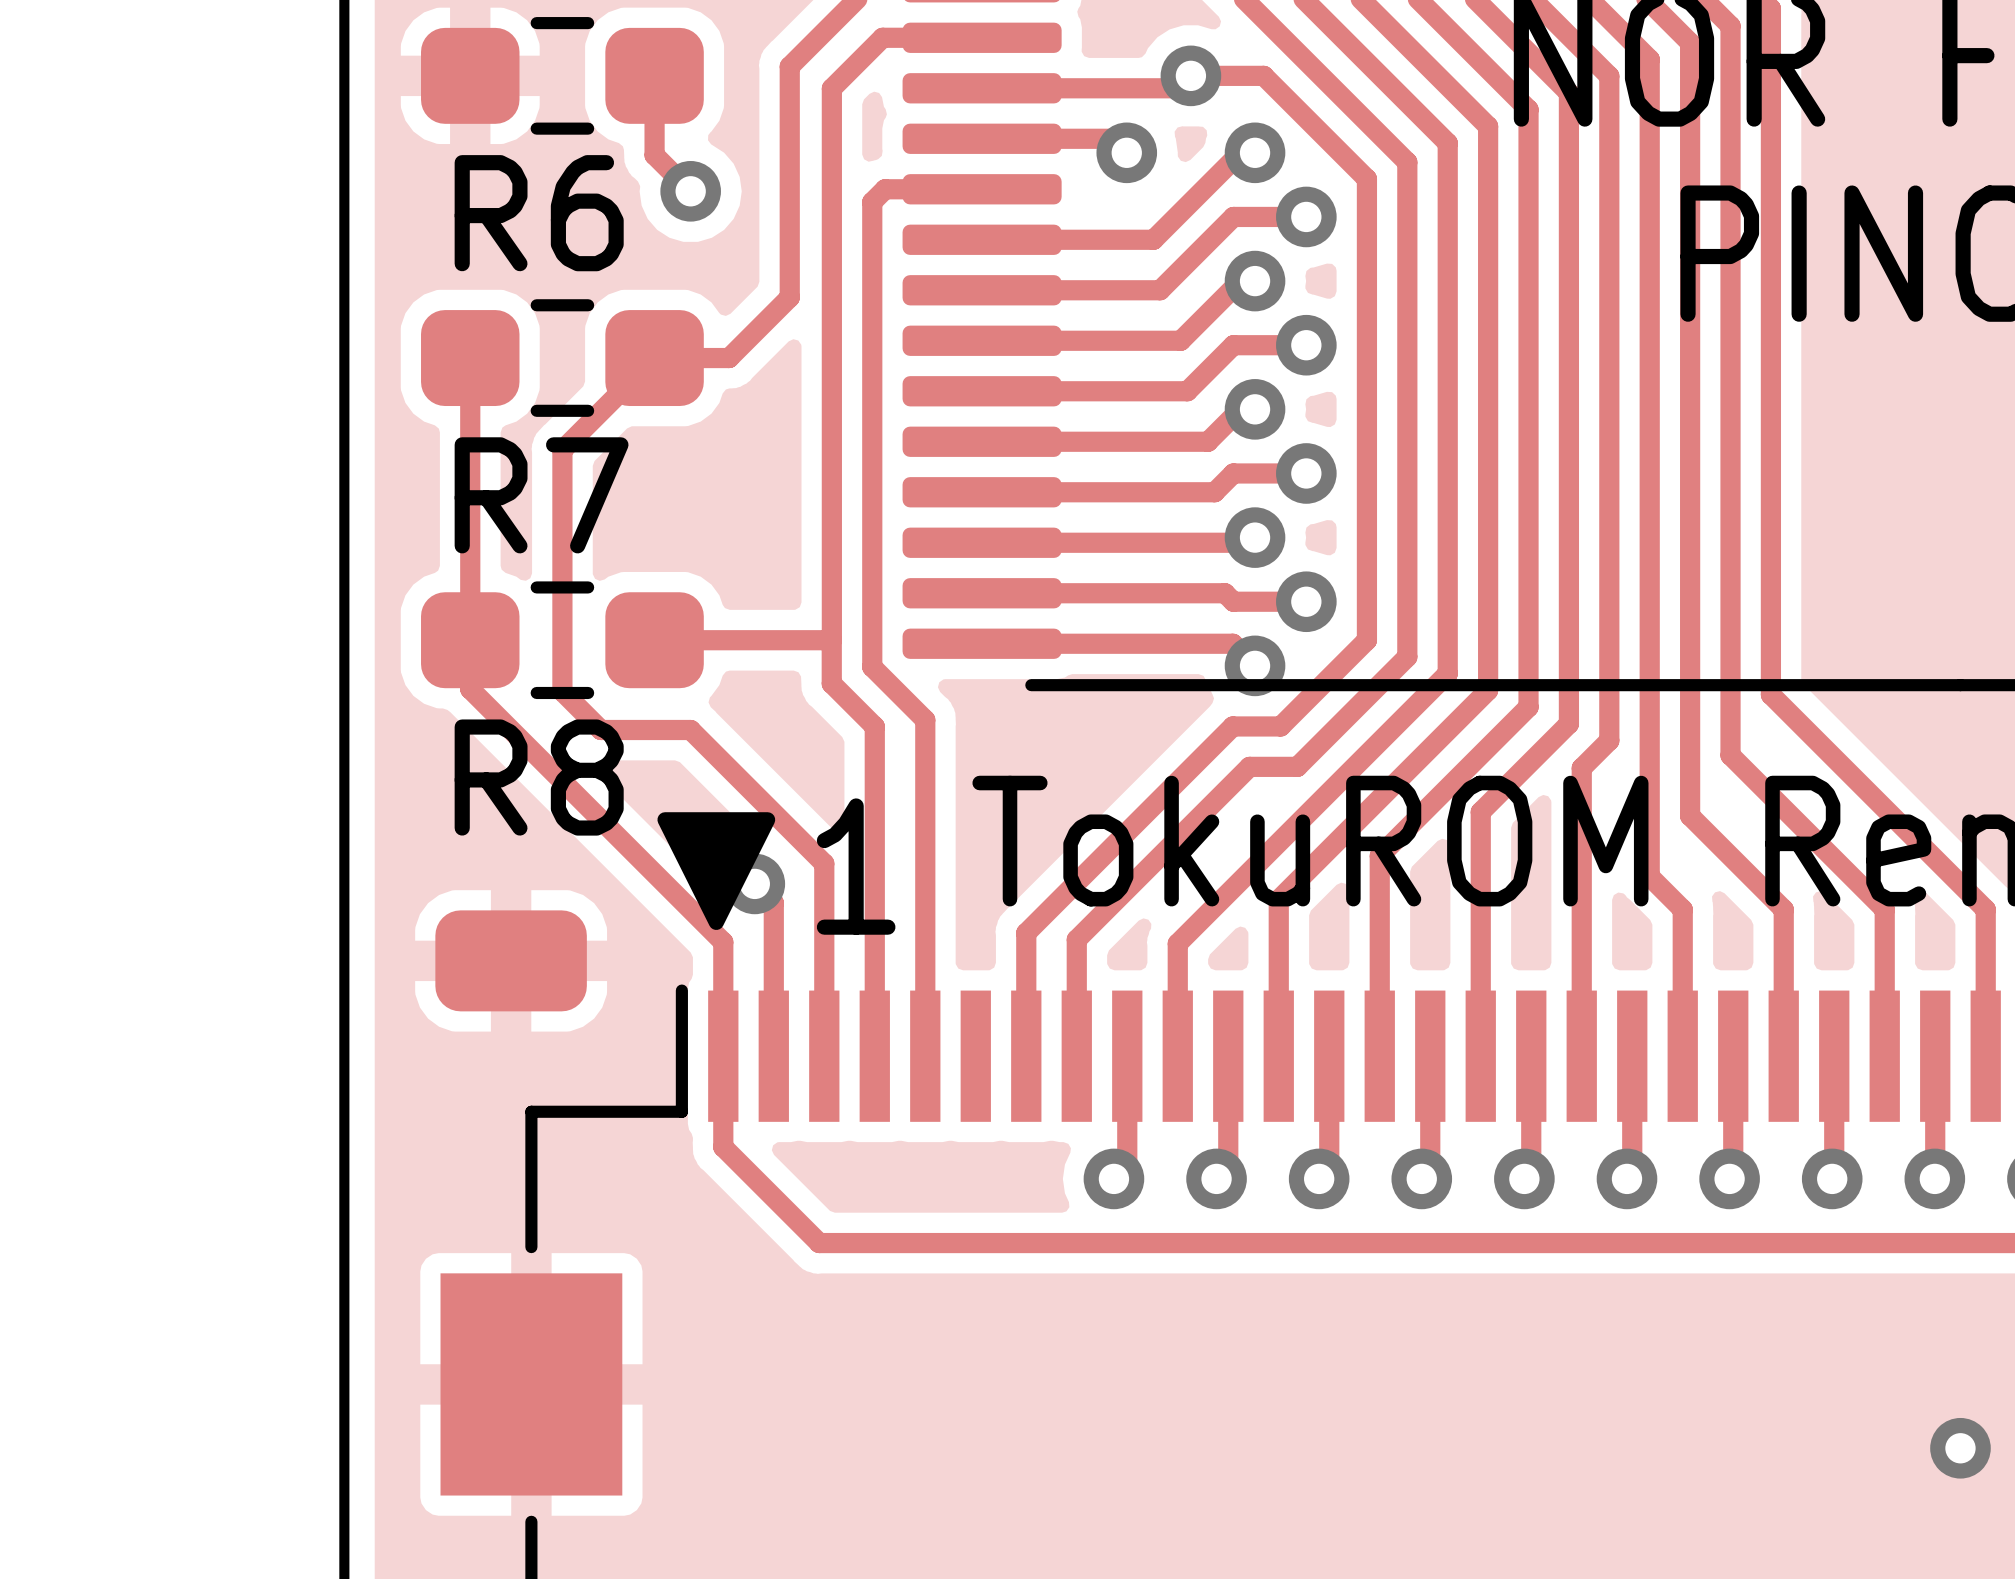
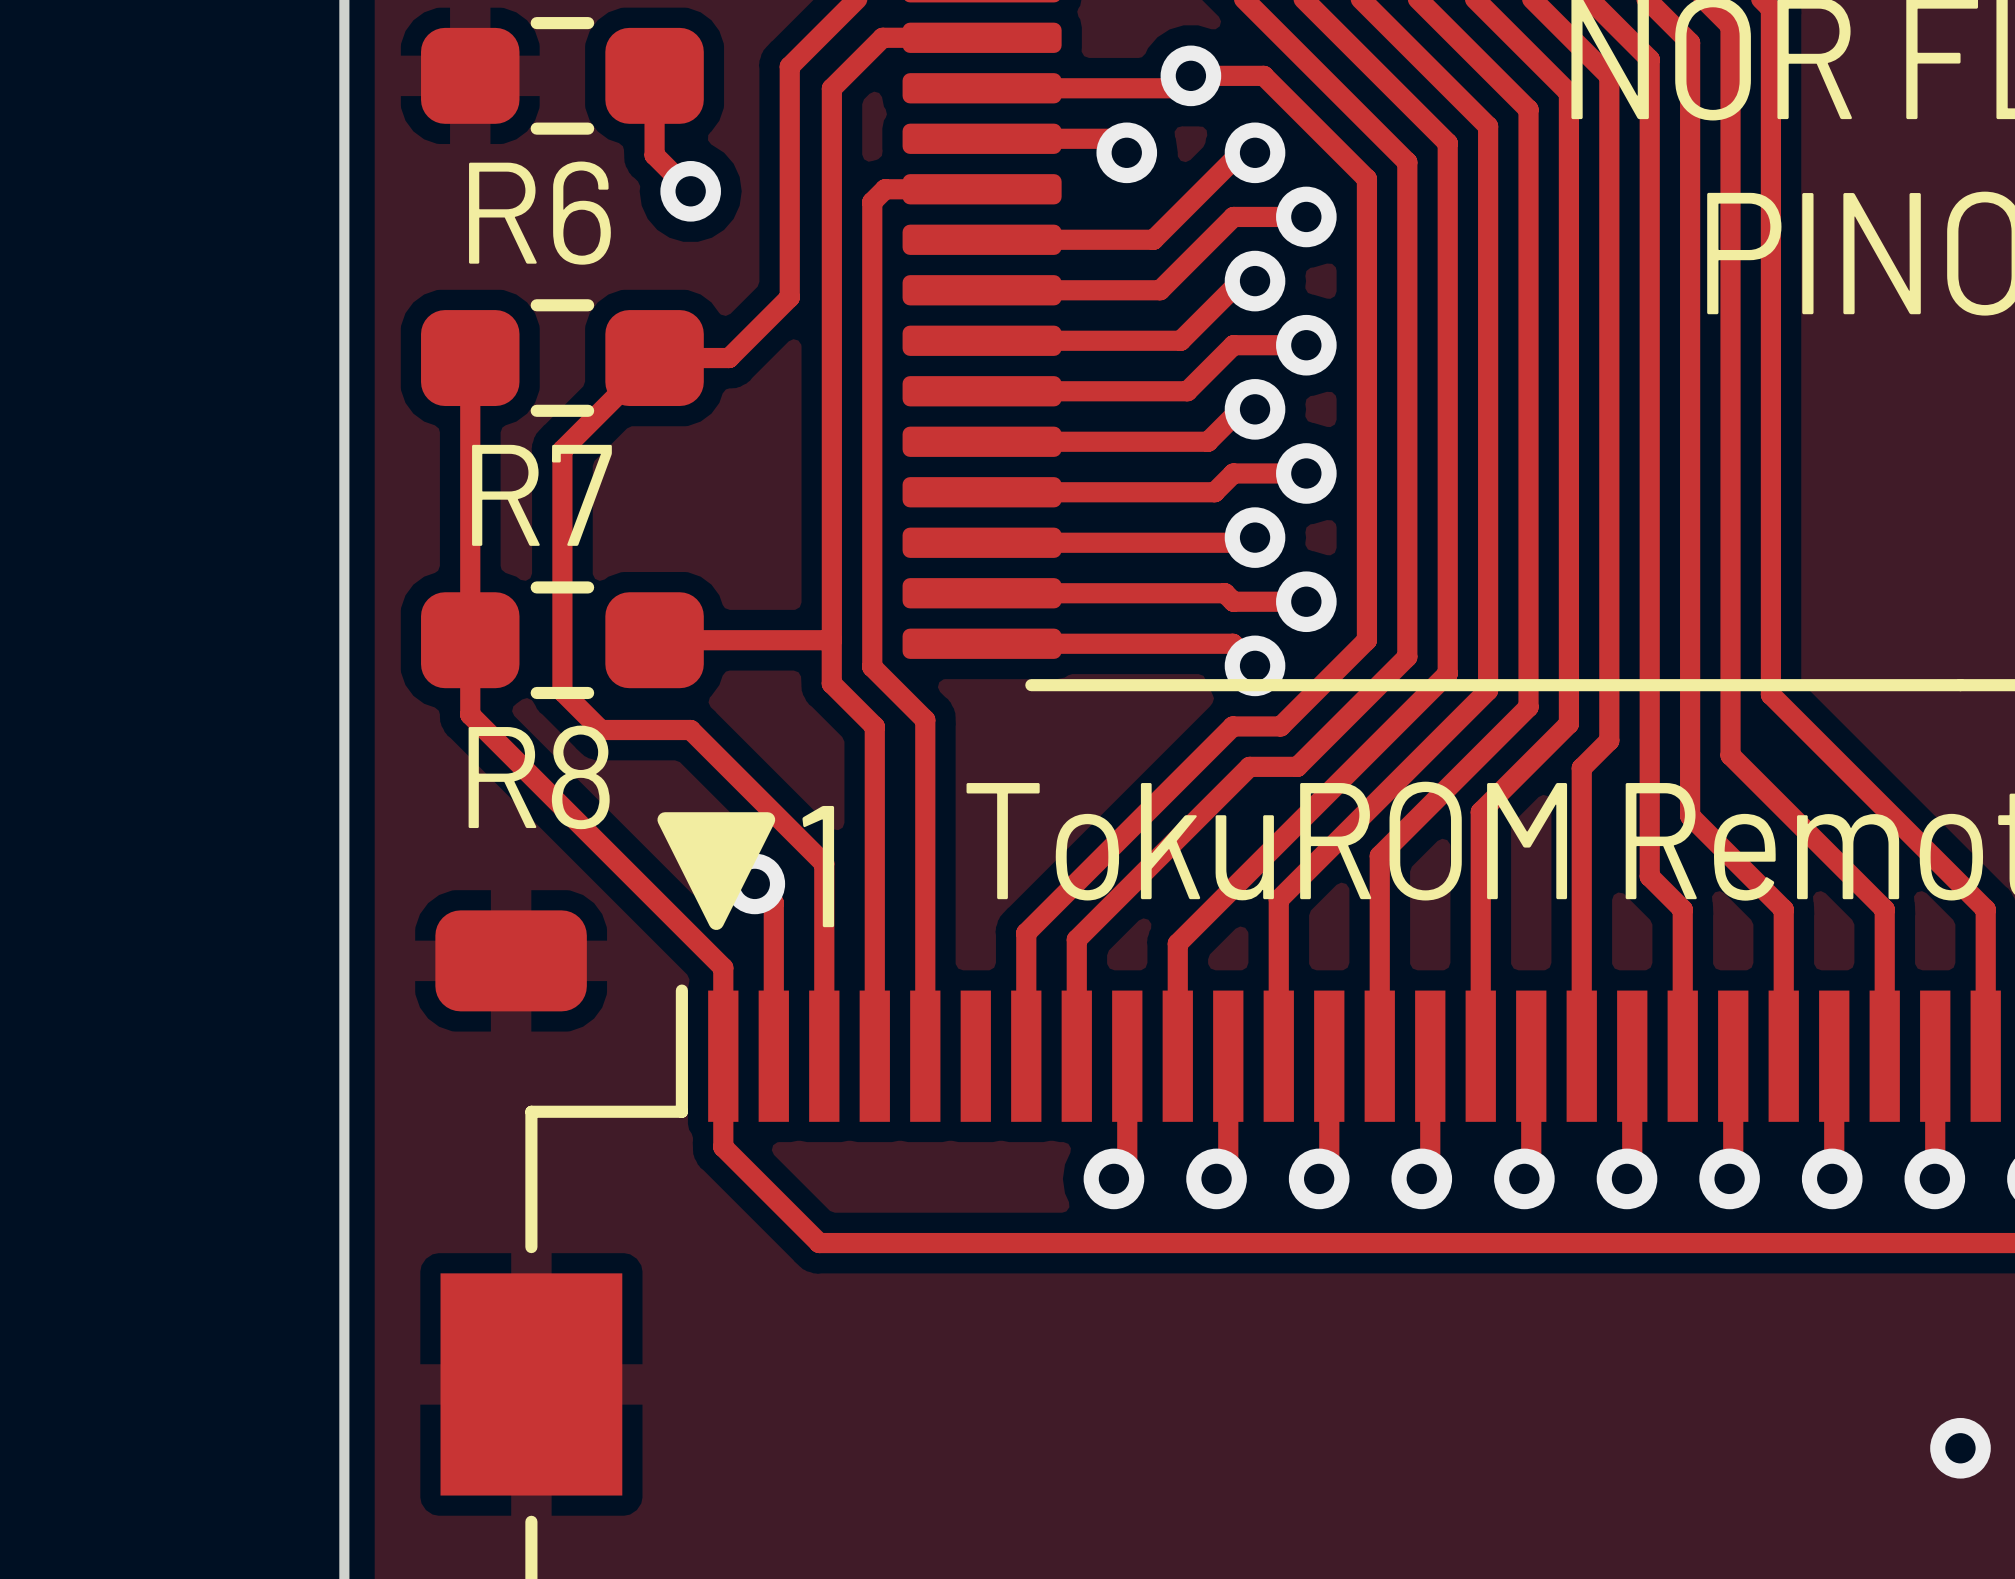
track: (470, 689) (723, 942) (723, 967) -> (470, 689) (470, 714) (723, 967)

